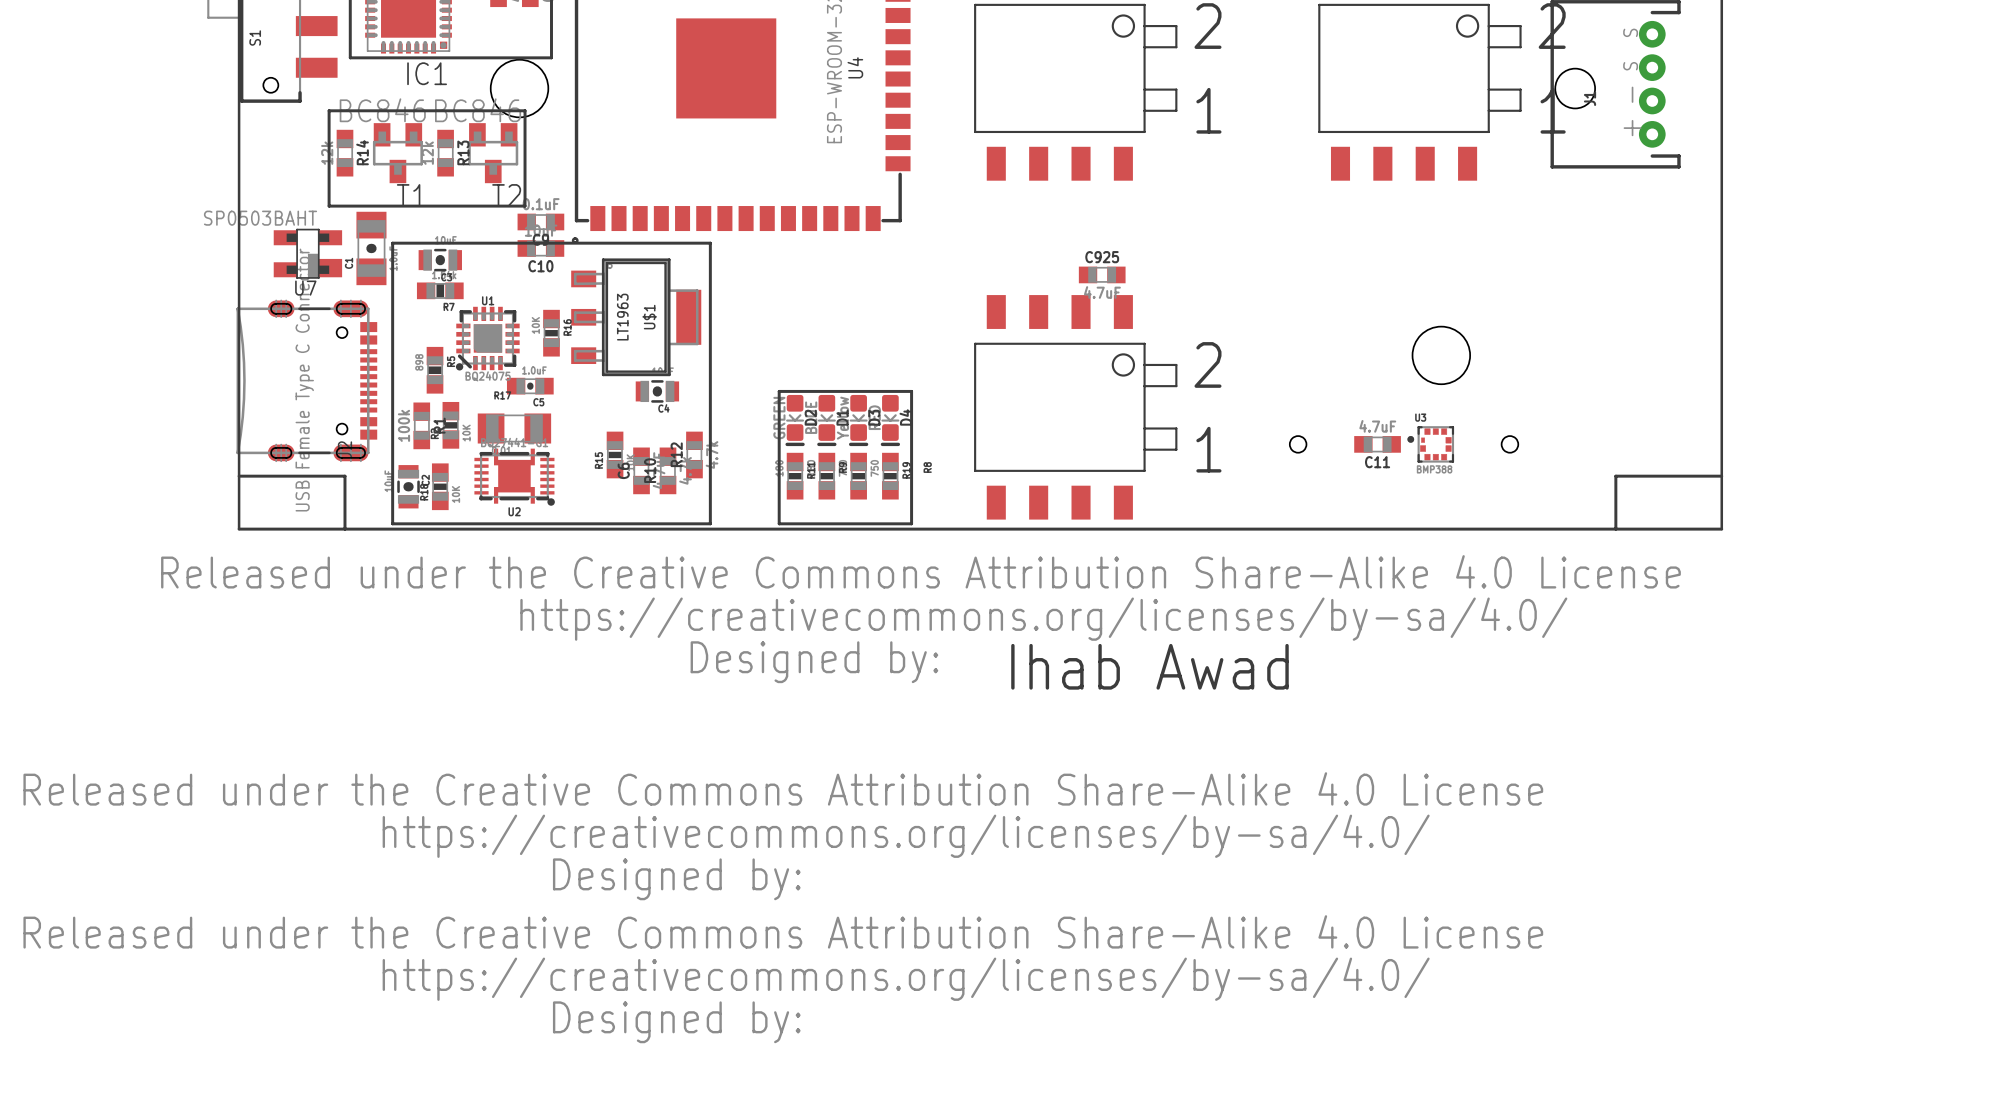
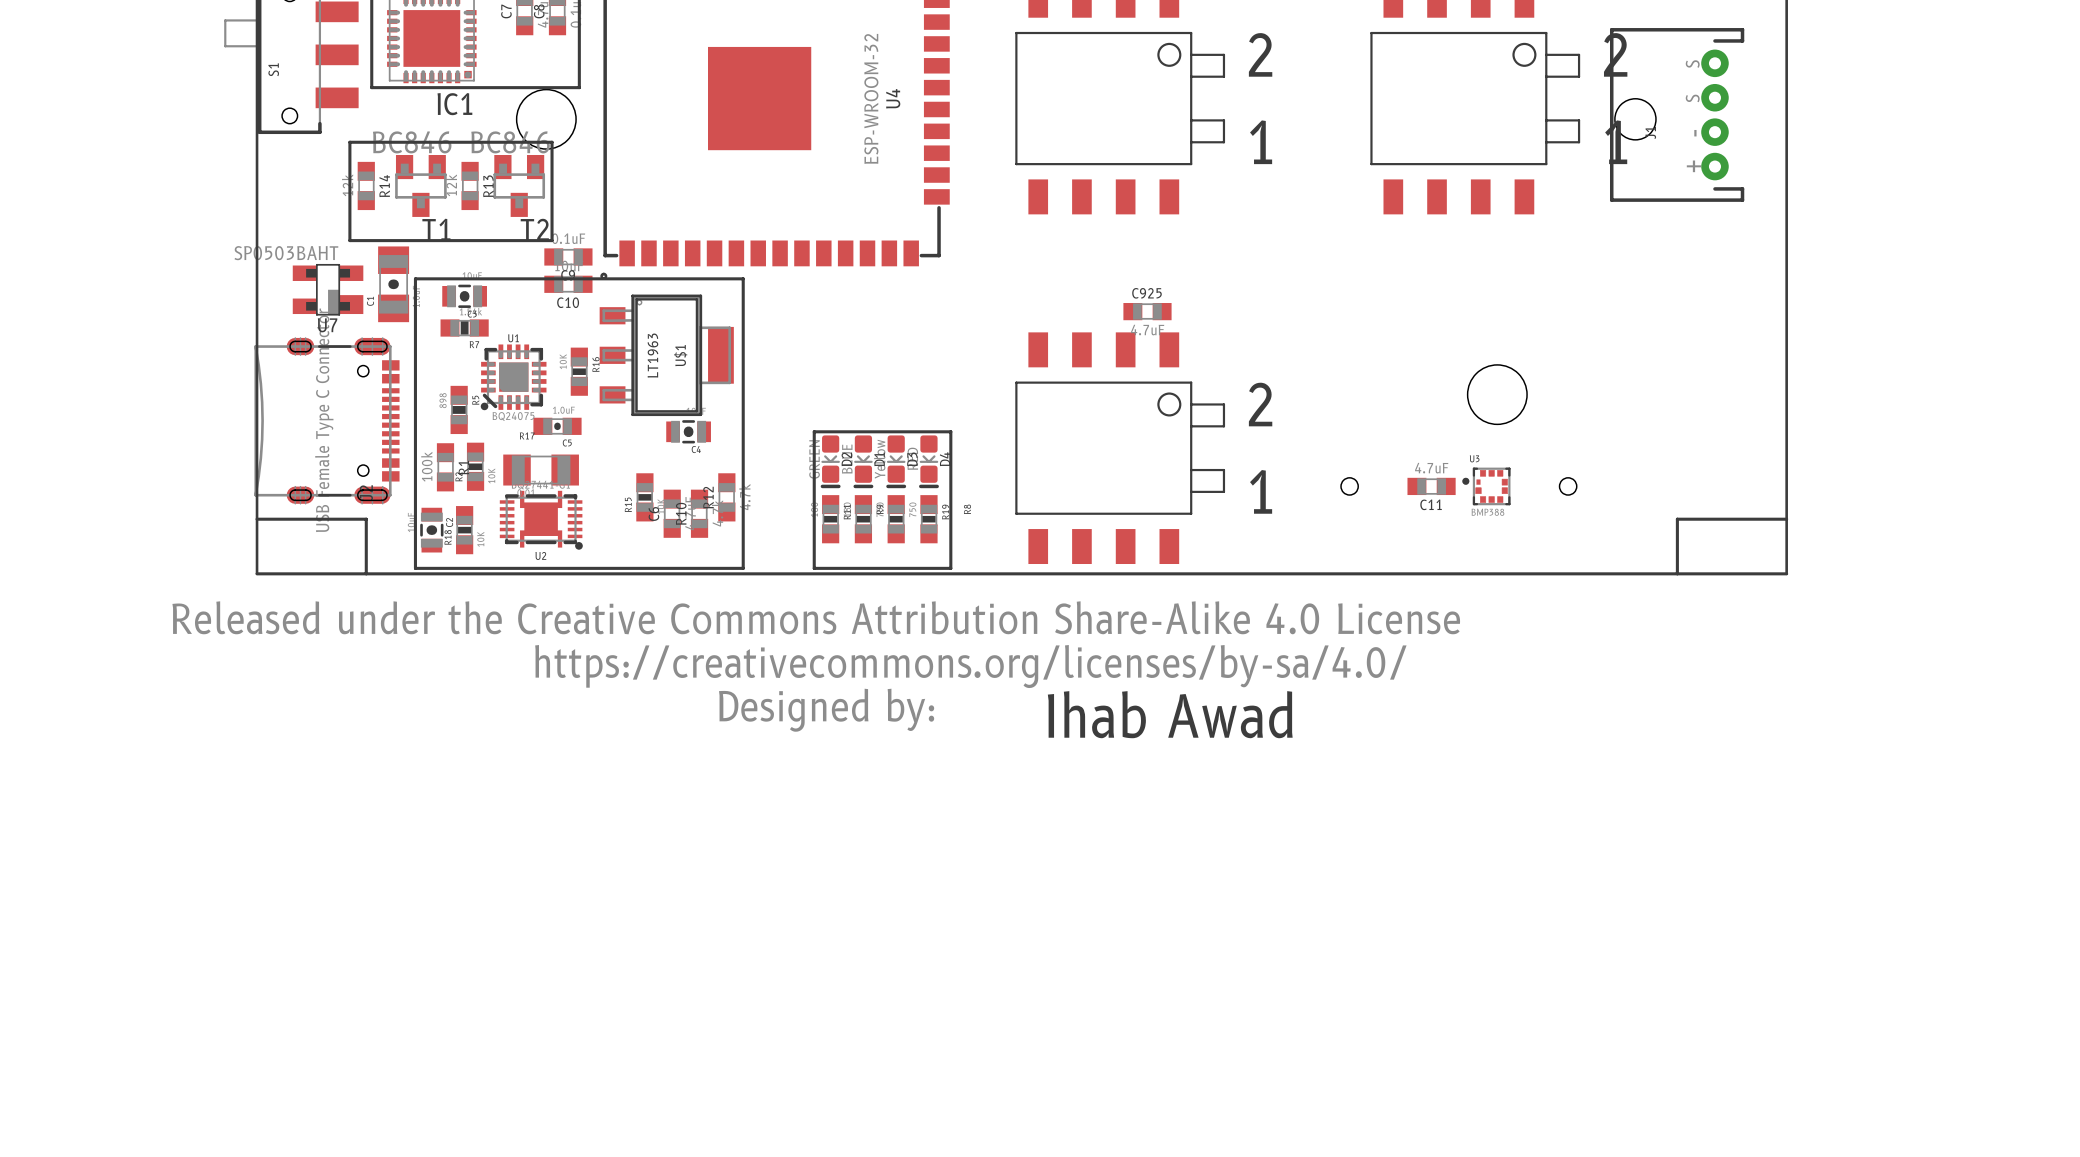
drawing: [23, 772, 1544, 1044] -> none

